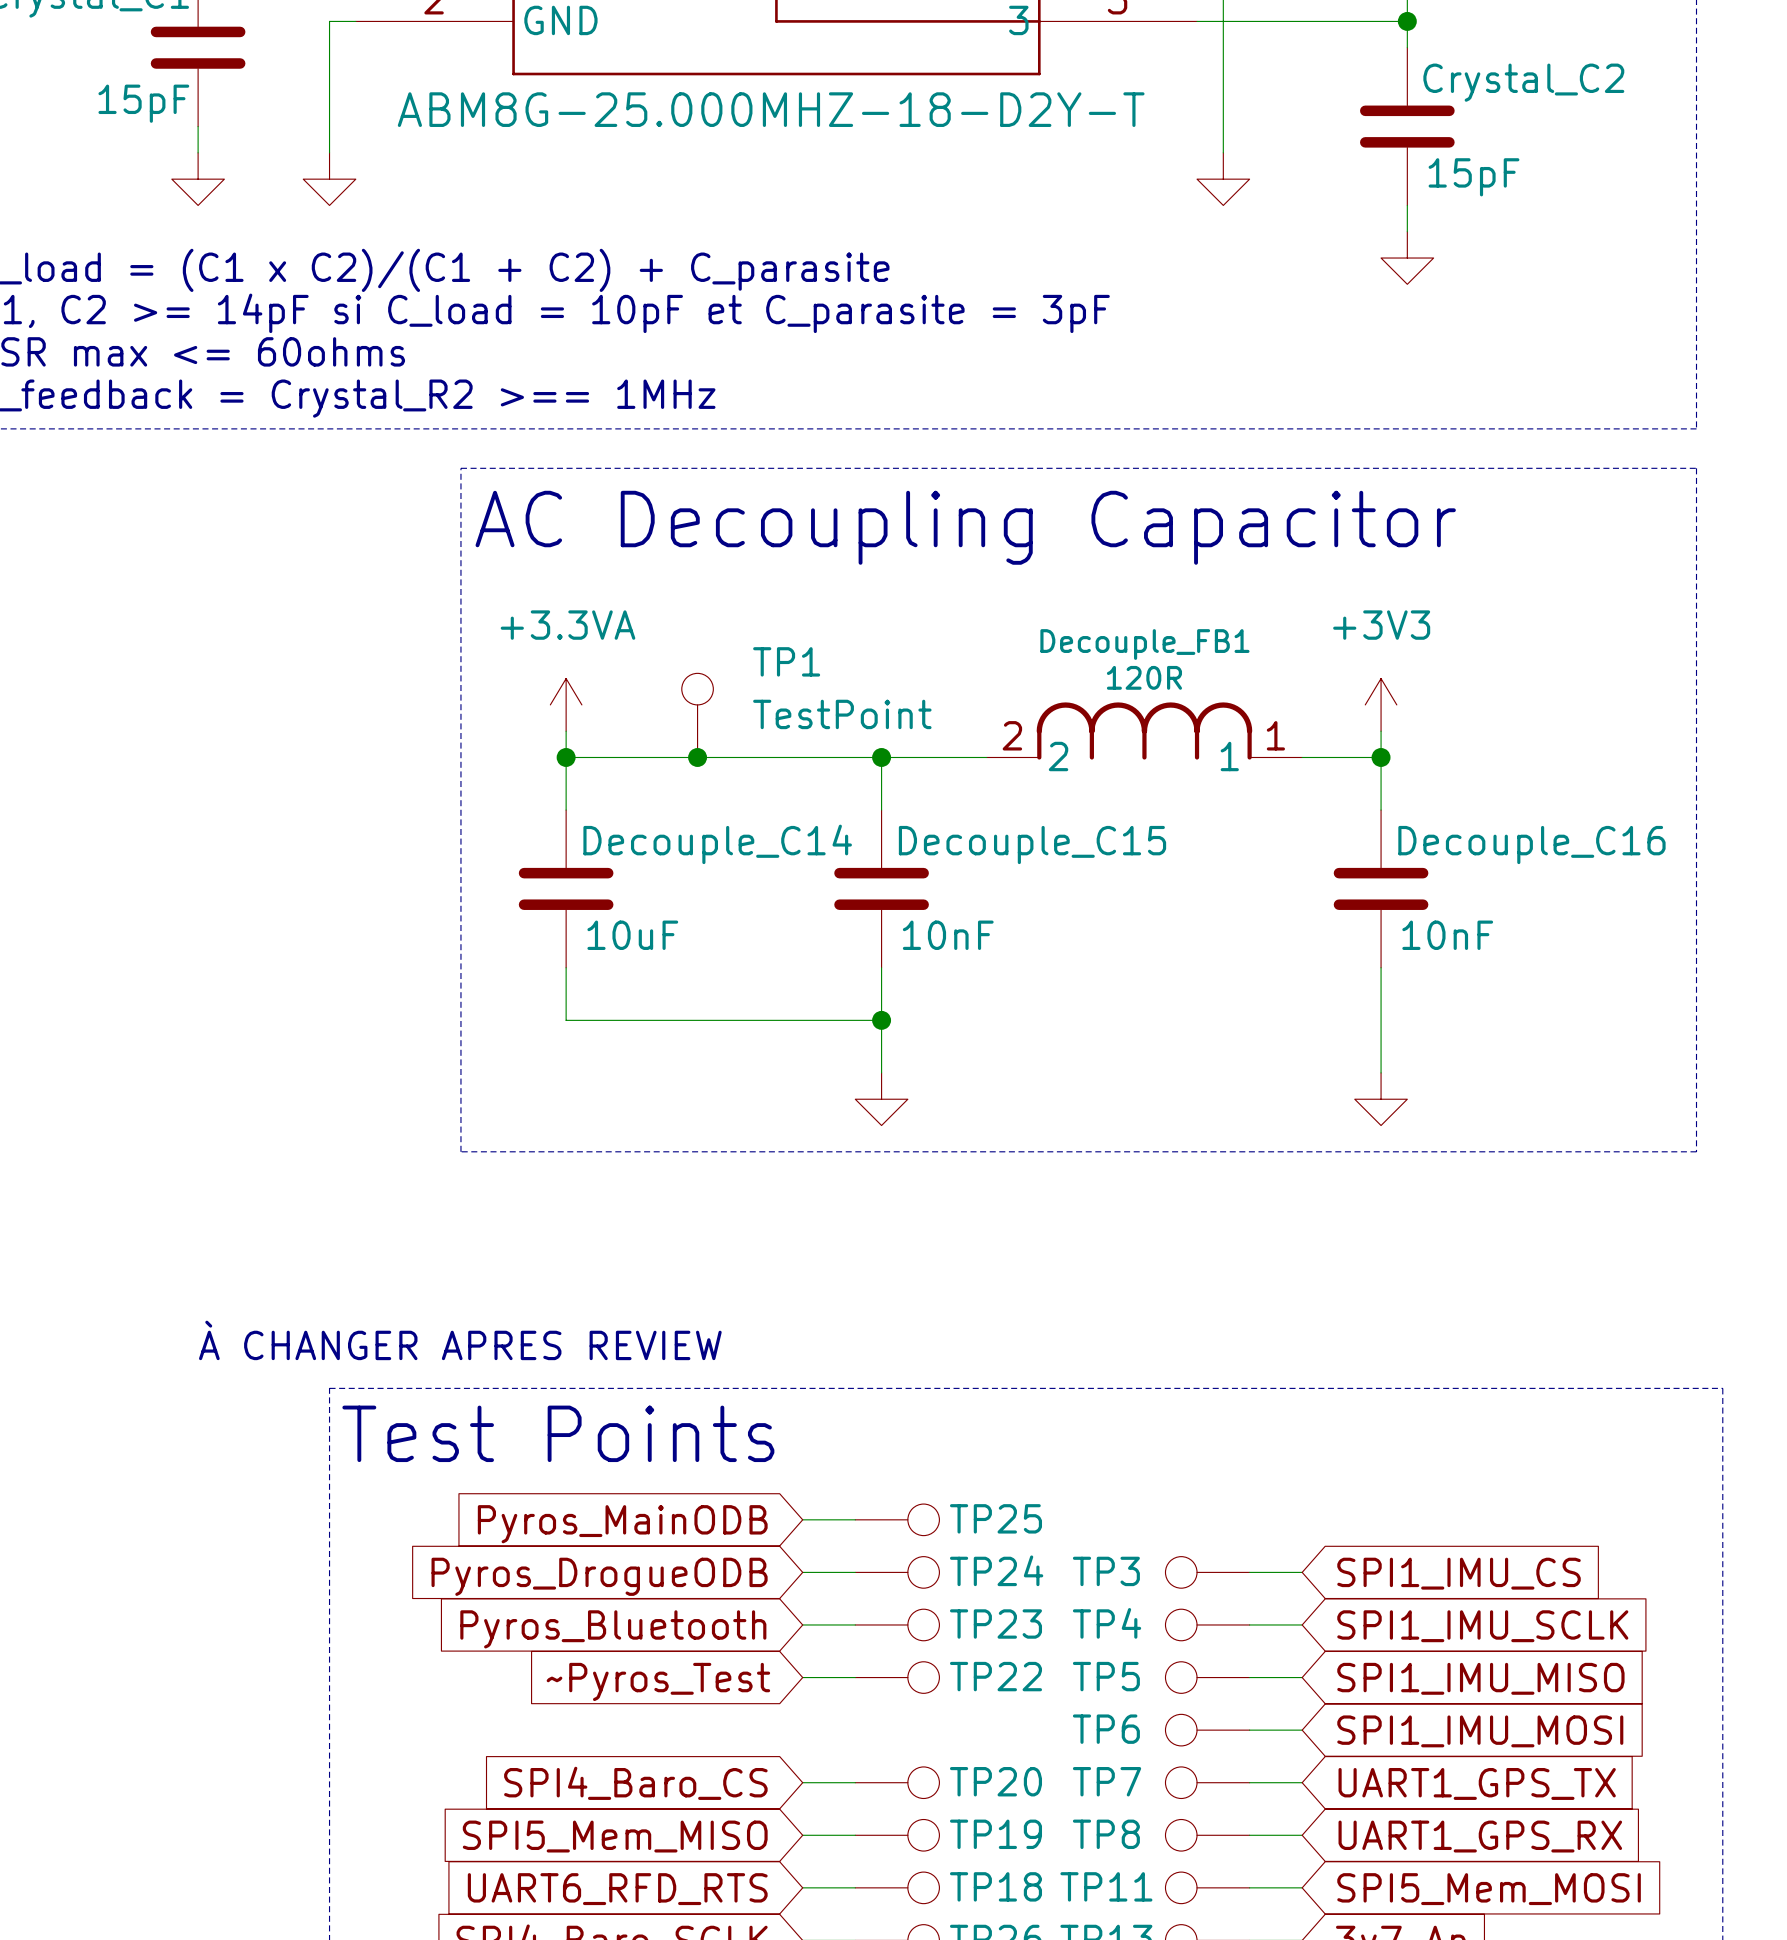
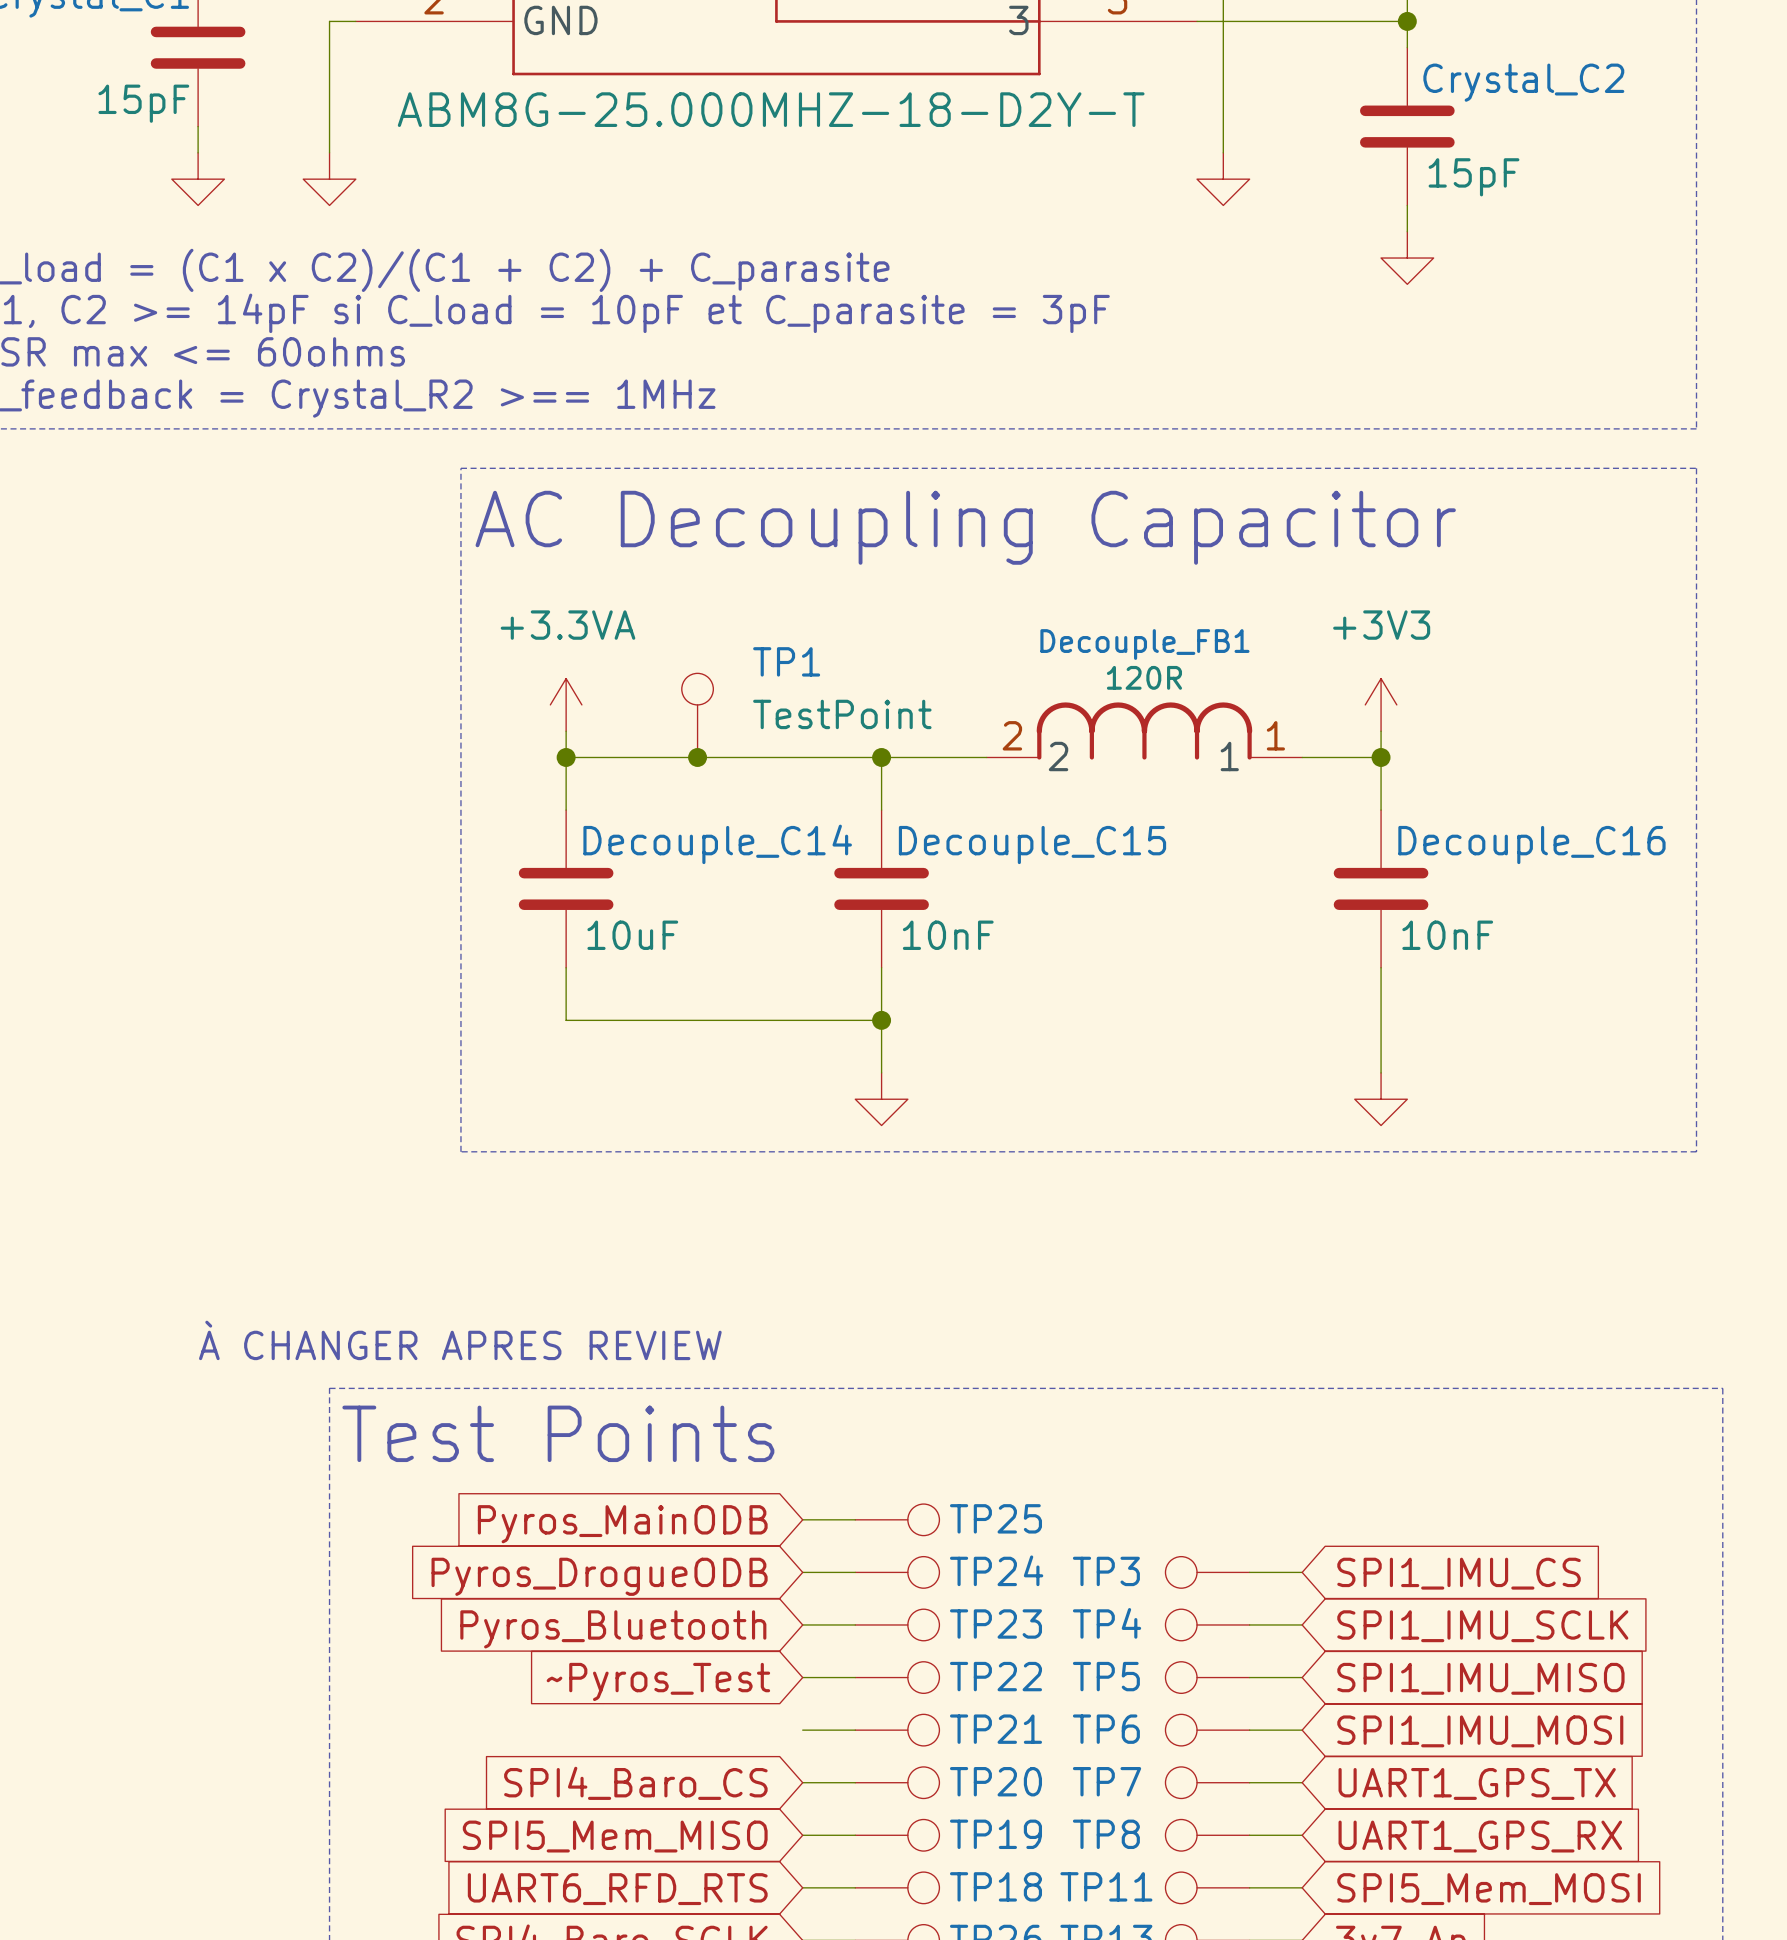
wire: none -> (802, 1730) (855, 1730)
TP21: none -> (897, 1730)

